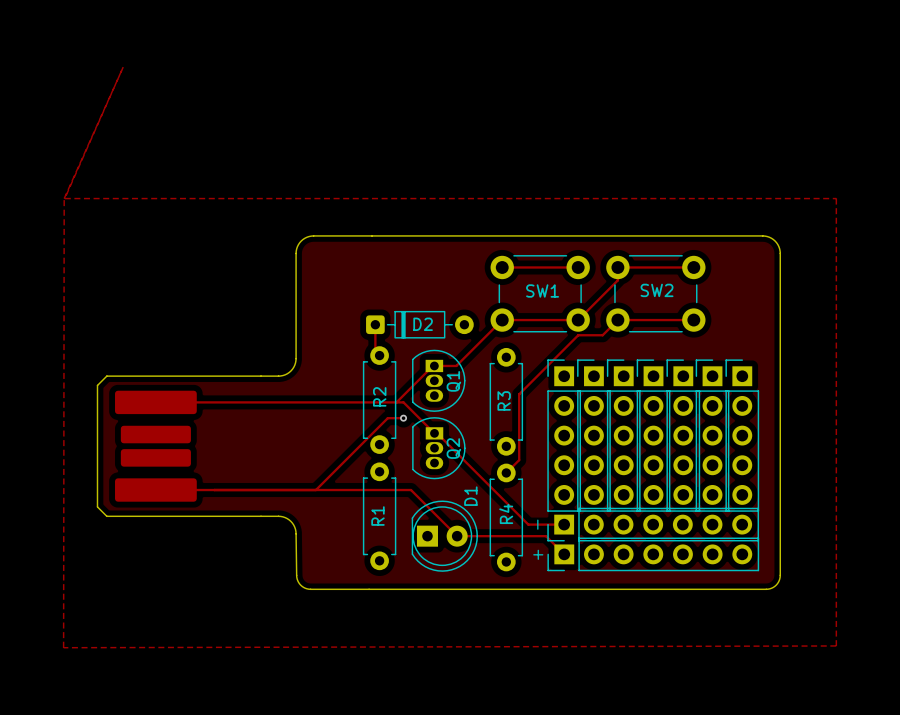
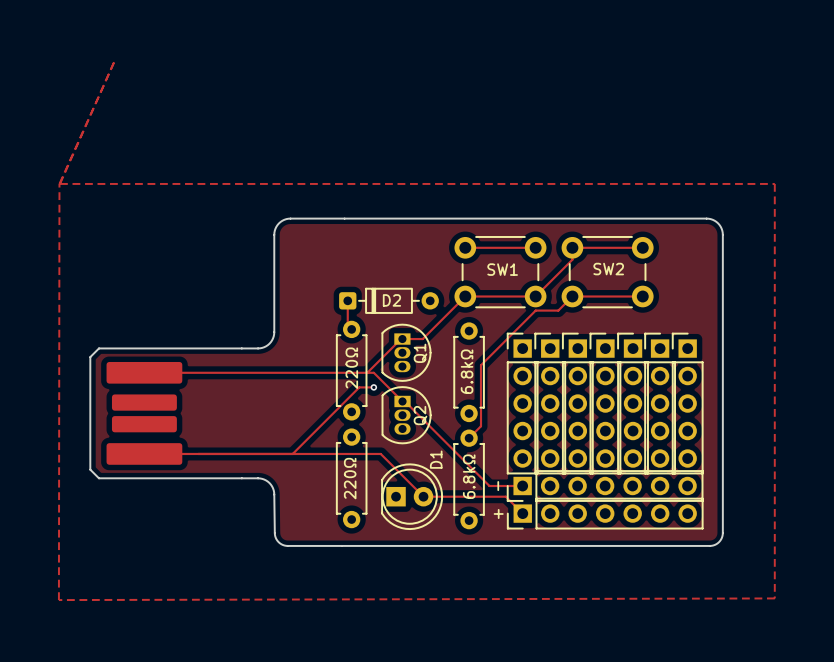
R2 name: R2 (379, 396) -> 220Ω (351, 368)
R3 name: R3 (504, 400) -> 6.8kΩ (467, 371)
R4 name: R4 (506, 513) -> 6.8kΩ (469, 476)
R1 name: R1 (377, 516) -> 220Ω (350, 478)

